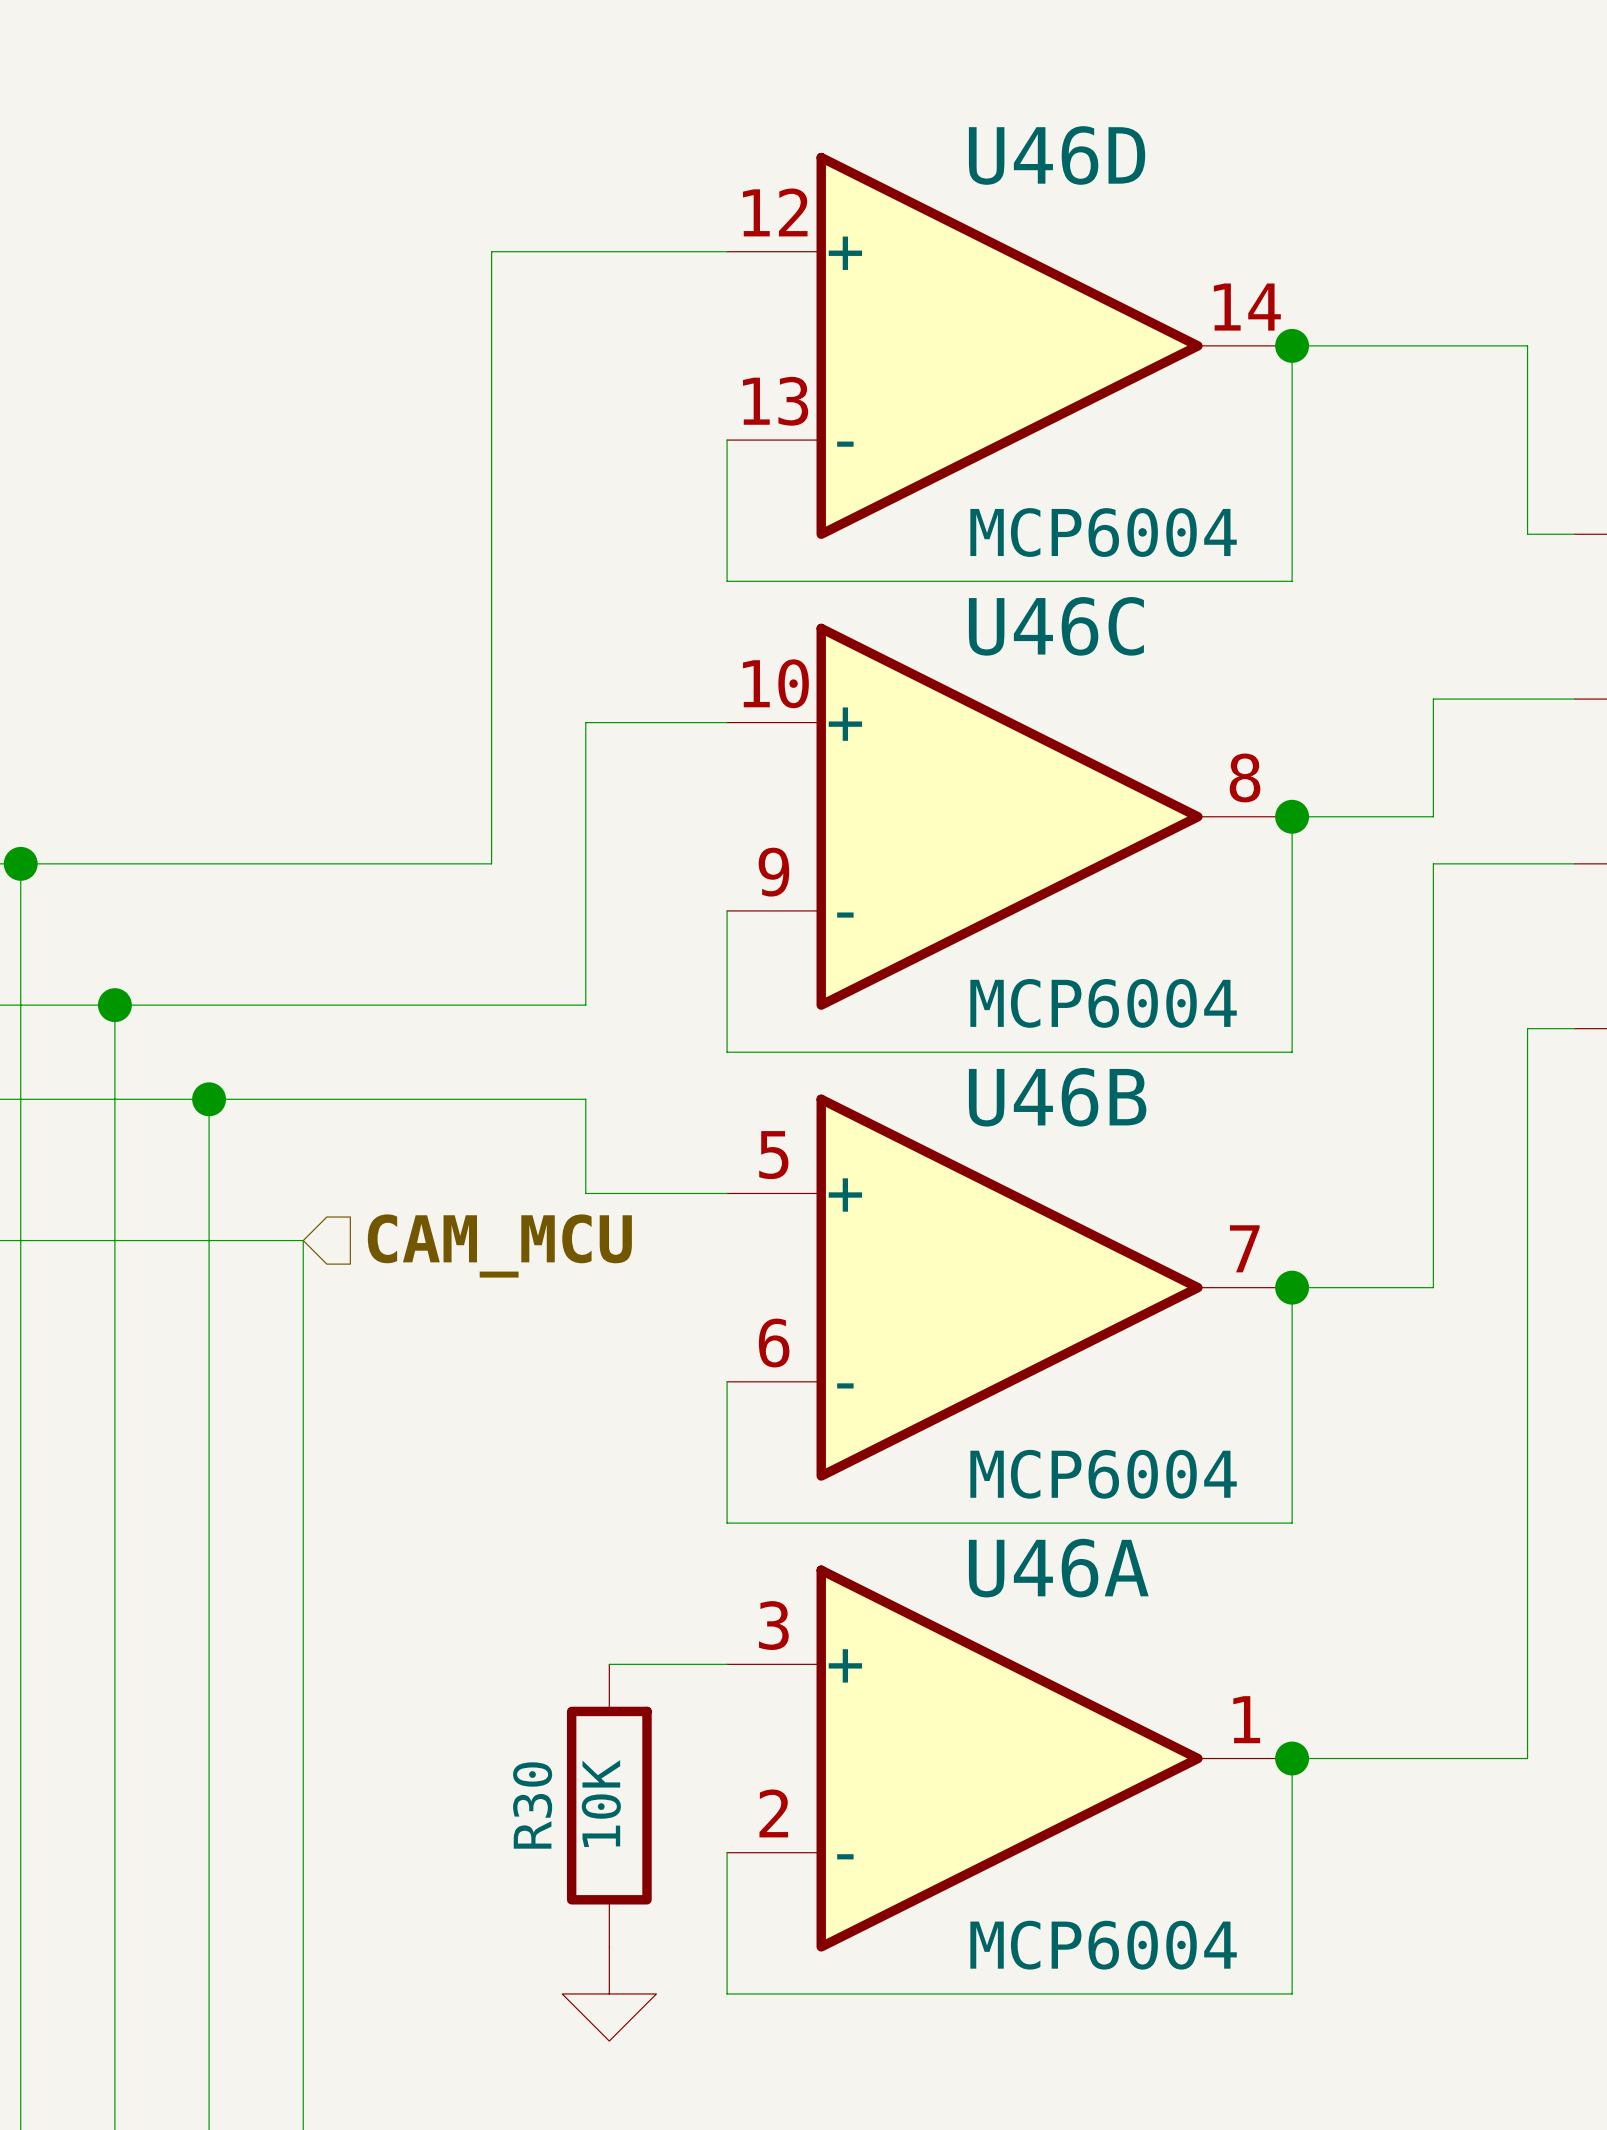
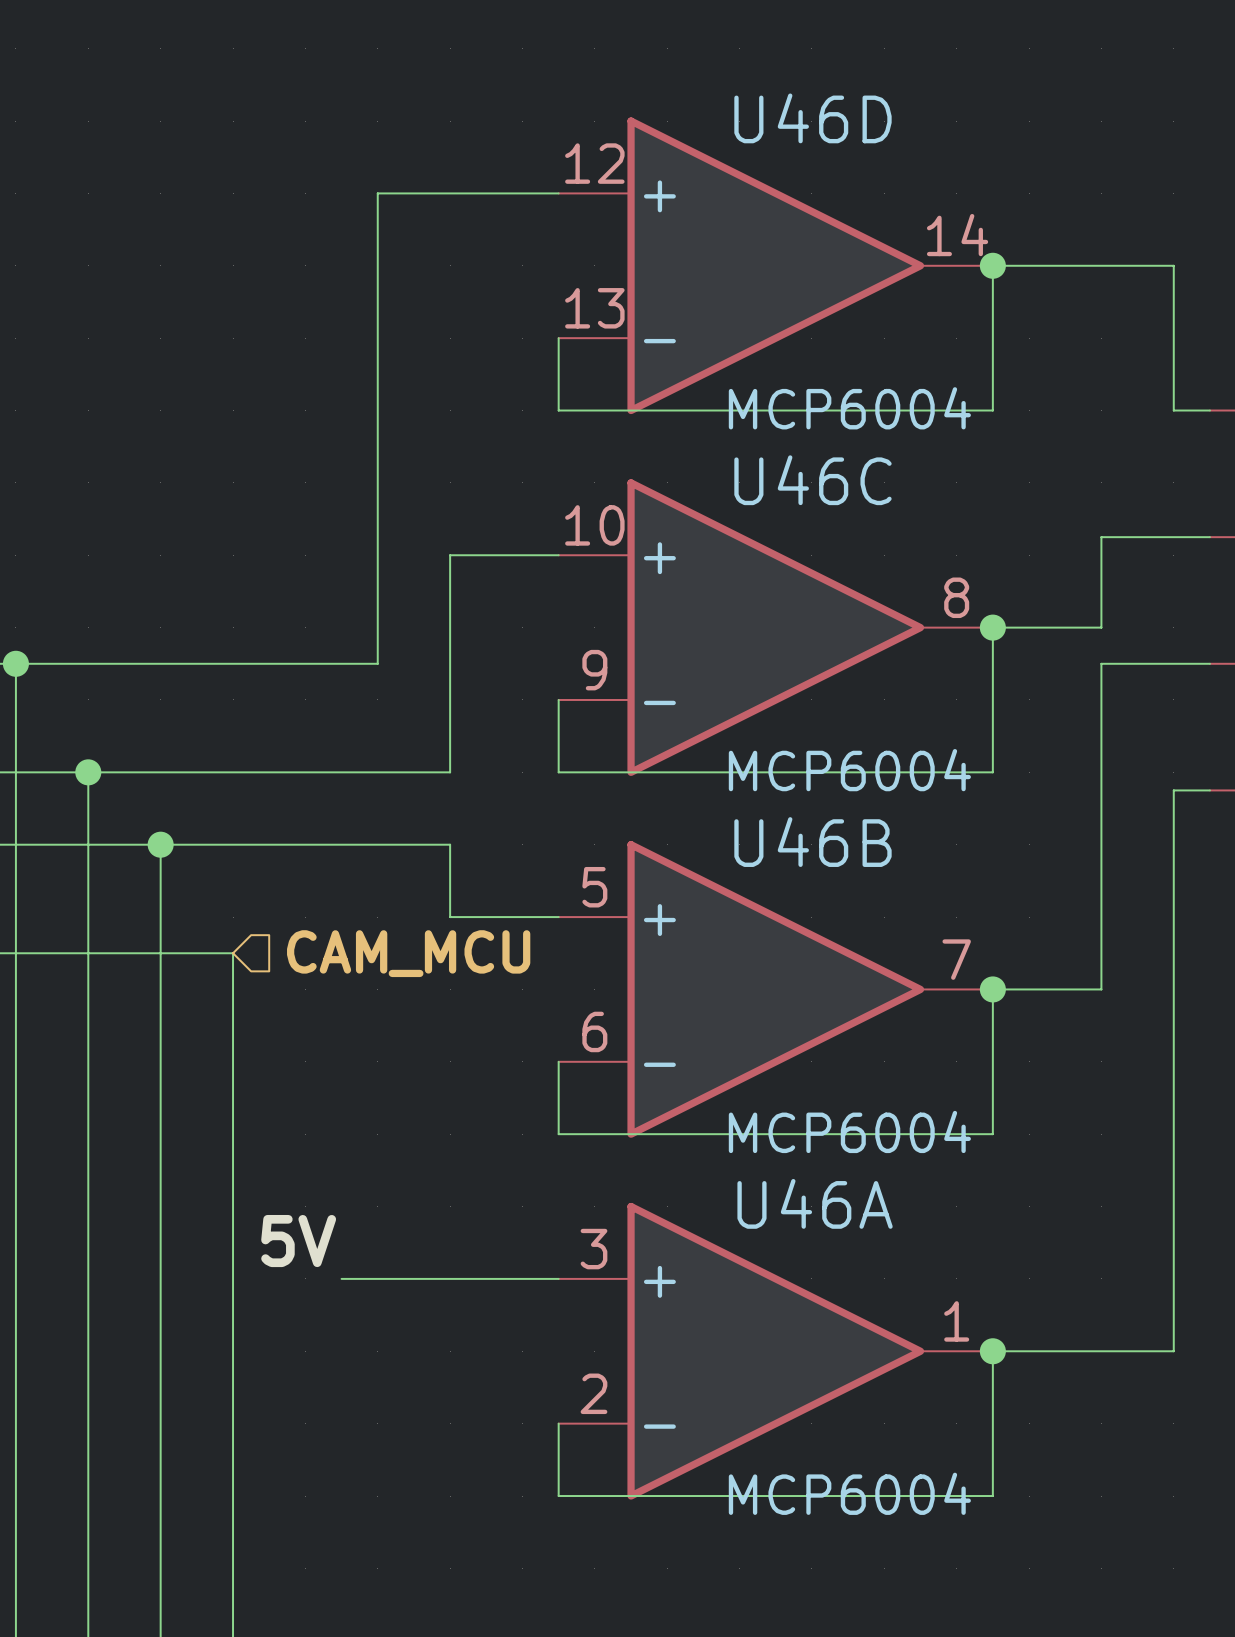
wire: (727, 534) (727, 581) (1292, 581) (1292, 534) -> (558, 410) (992, 410)
wire: (727, 1005) (727, 1052) (1292, 1052) (1292, 1005) -> (558, 772) (992, 772)
wire: (727, 1476) (727, 1523) (1292, 1523) (1292, 1476) -> (558, 1134) (992, 1134)
label: none -> 5V (298, 1241)
wire: none -> (341, 1278) (468, 1278)
R30: 10K (609, 1805) -> none
wire: (727, 1946) (727, 1993) (1292, 1993) (1292, 1946) -> (558, 1496) (992, 1496)
power symbol: (609, 1993) -> none

